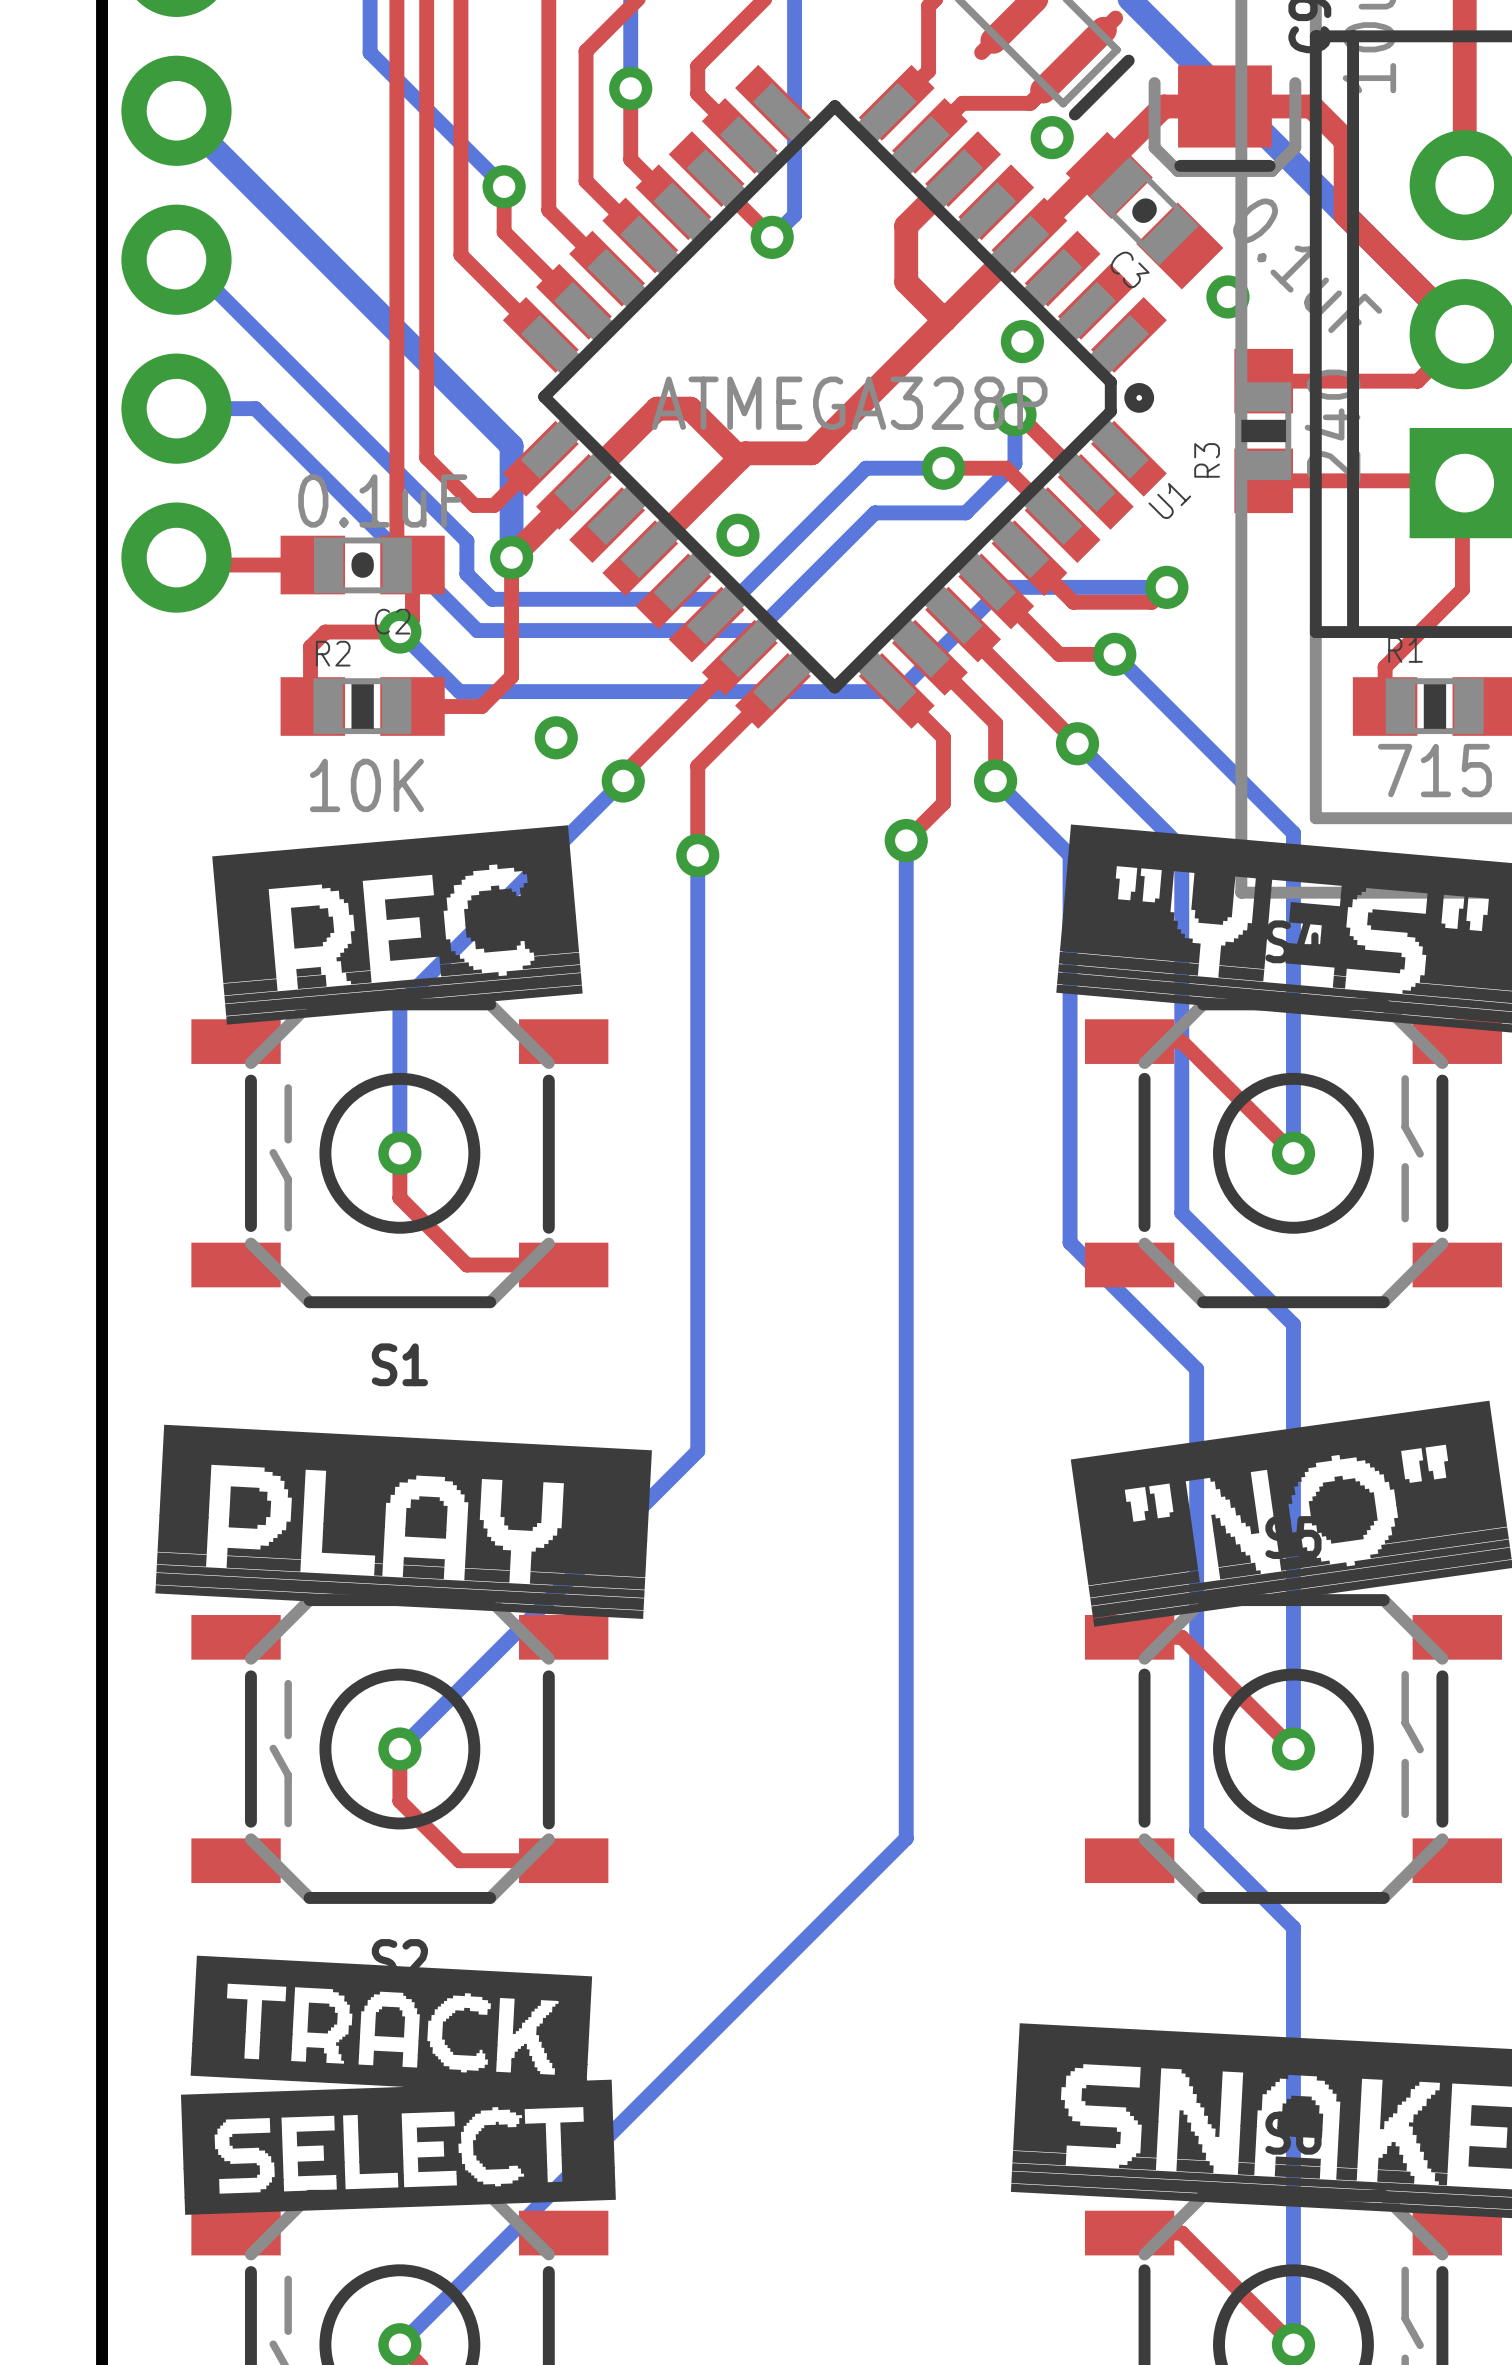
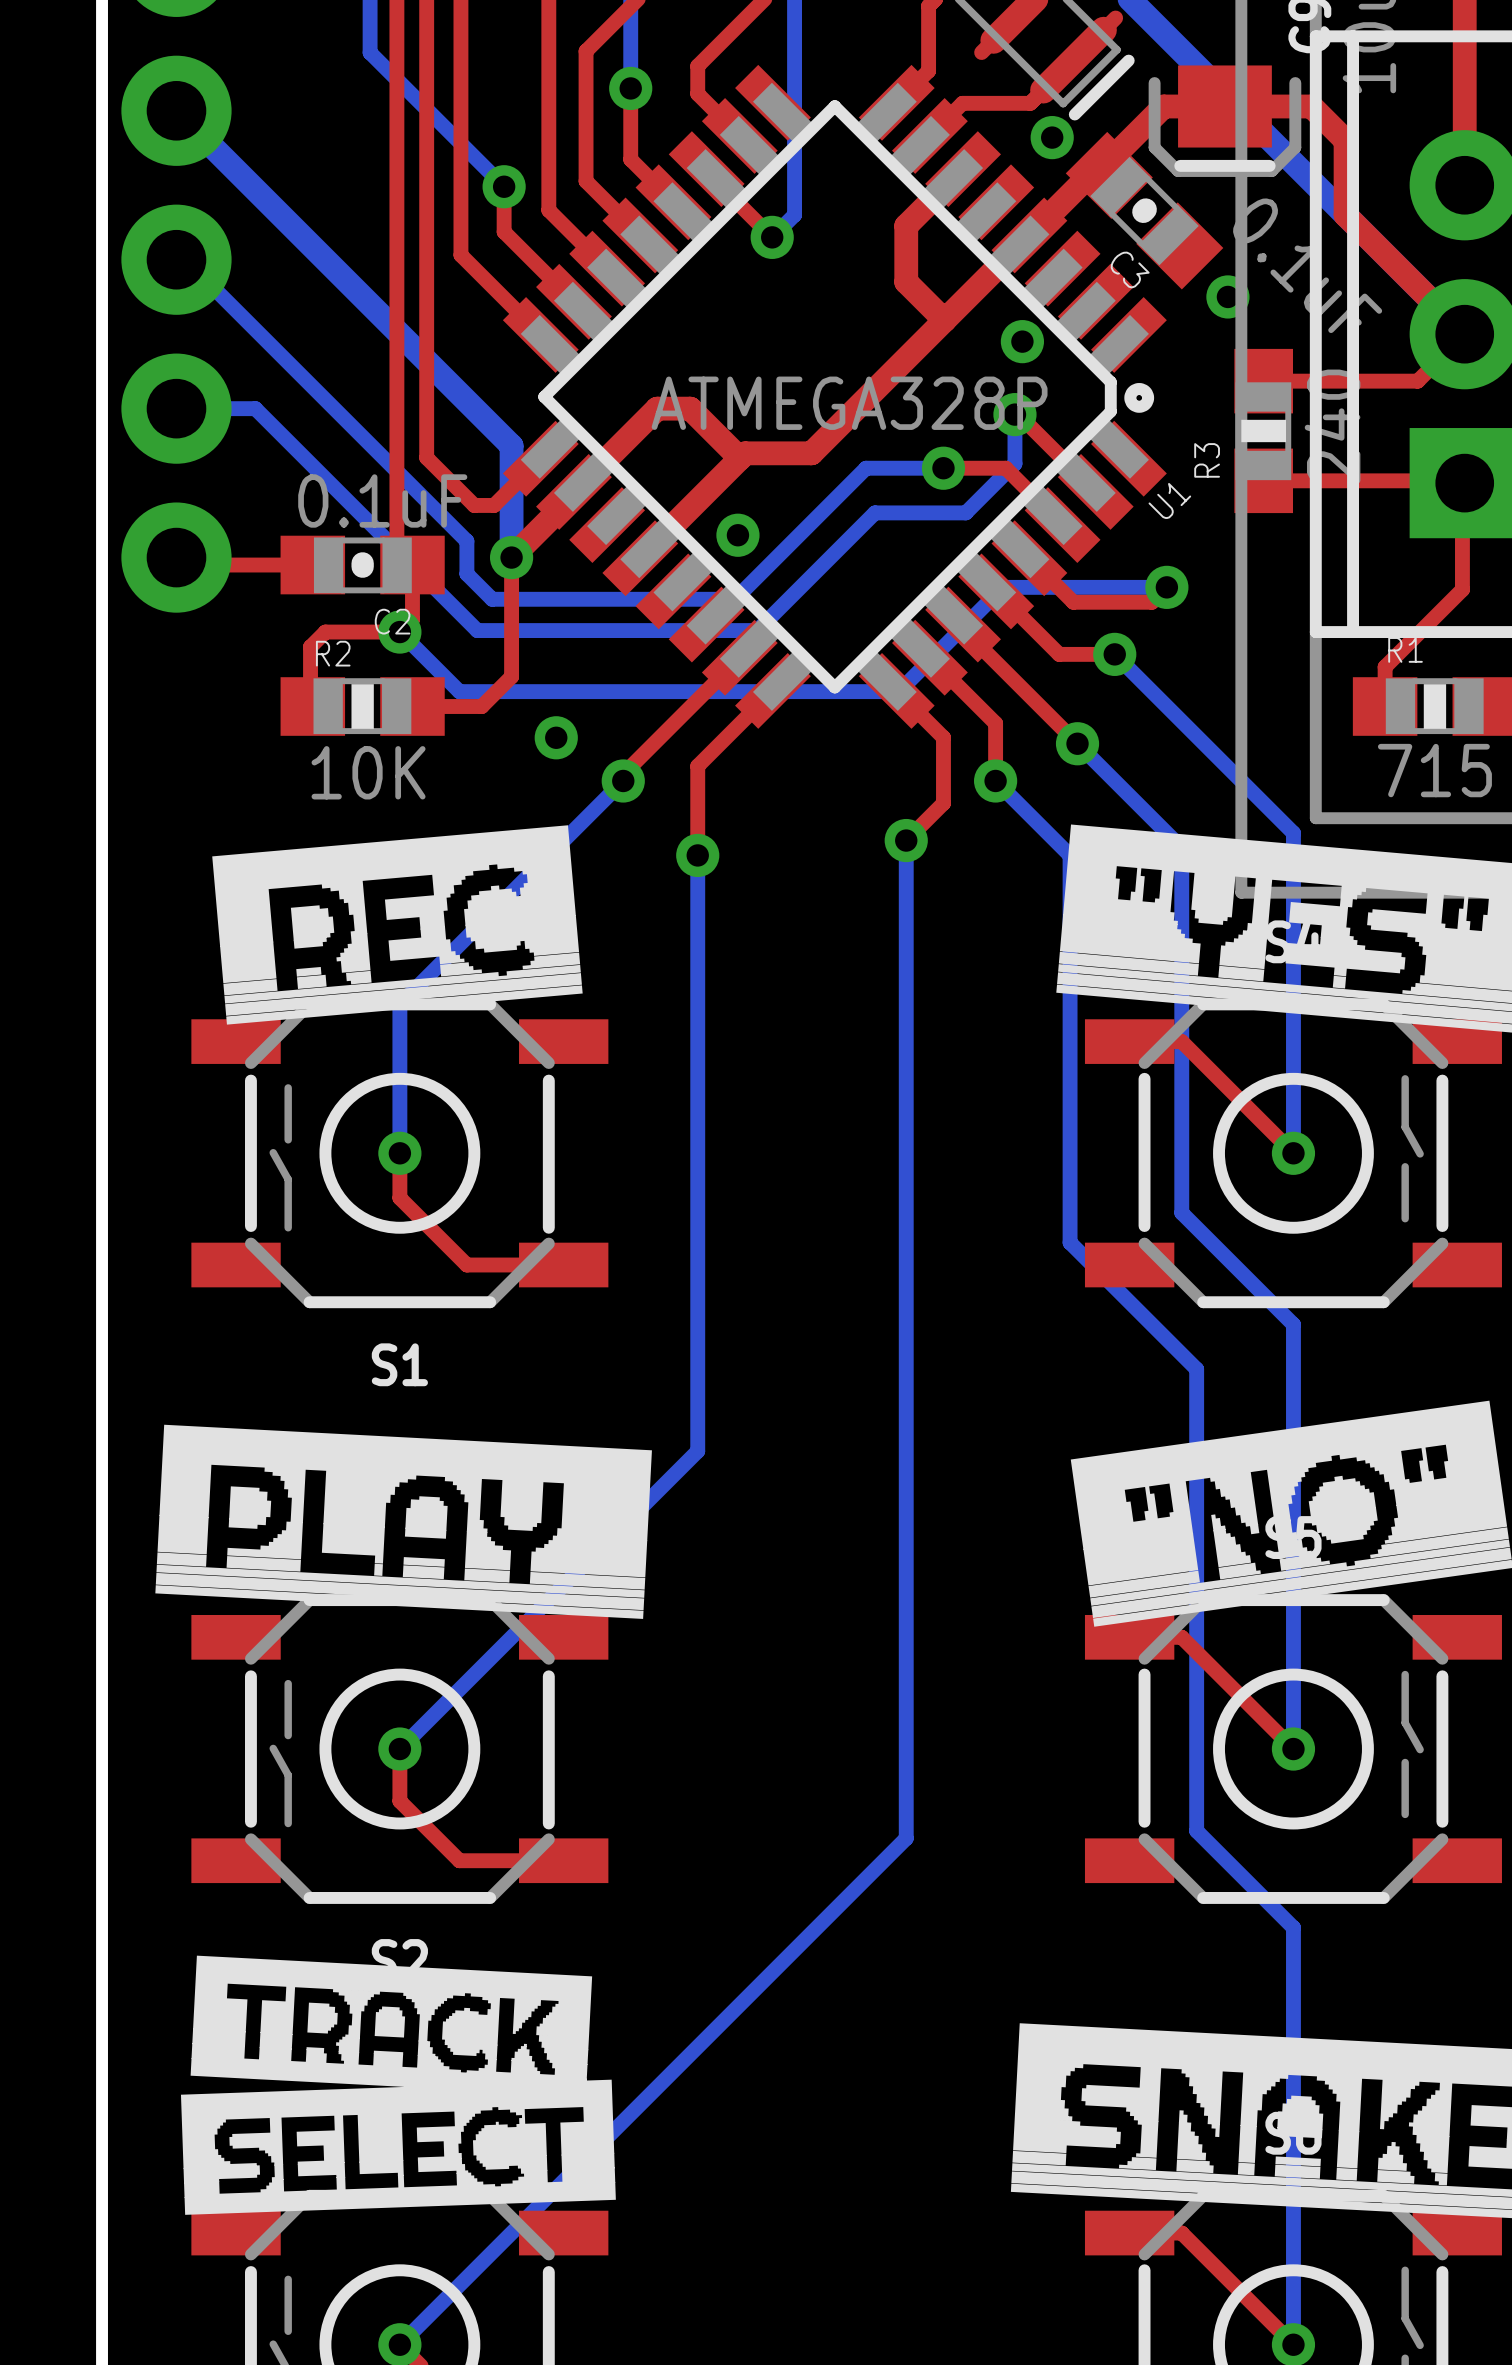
R2 value position: 10K (366, 785) -> 10K (368, 772)

